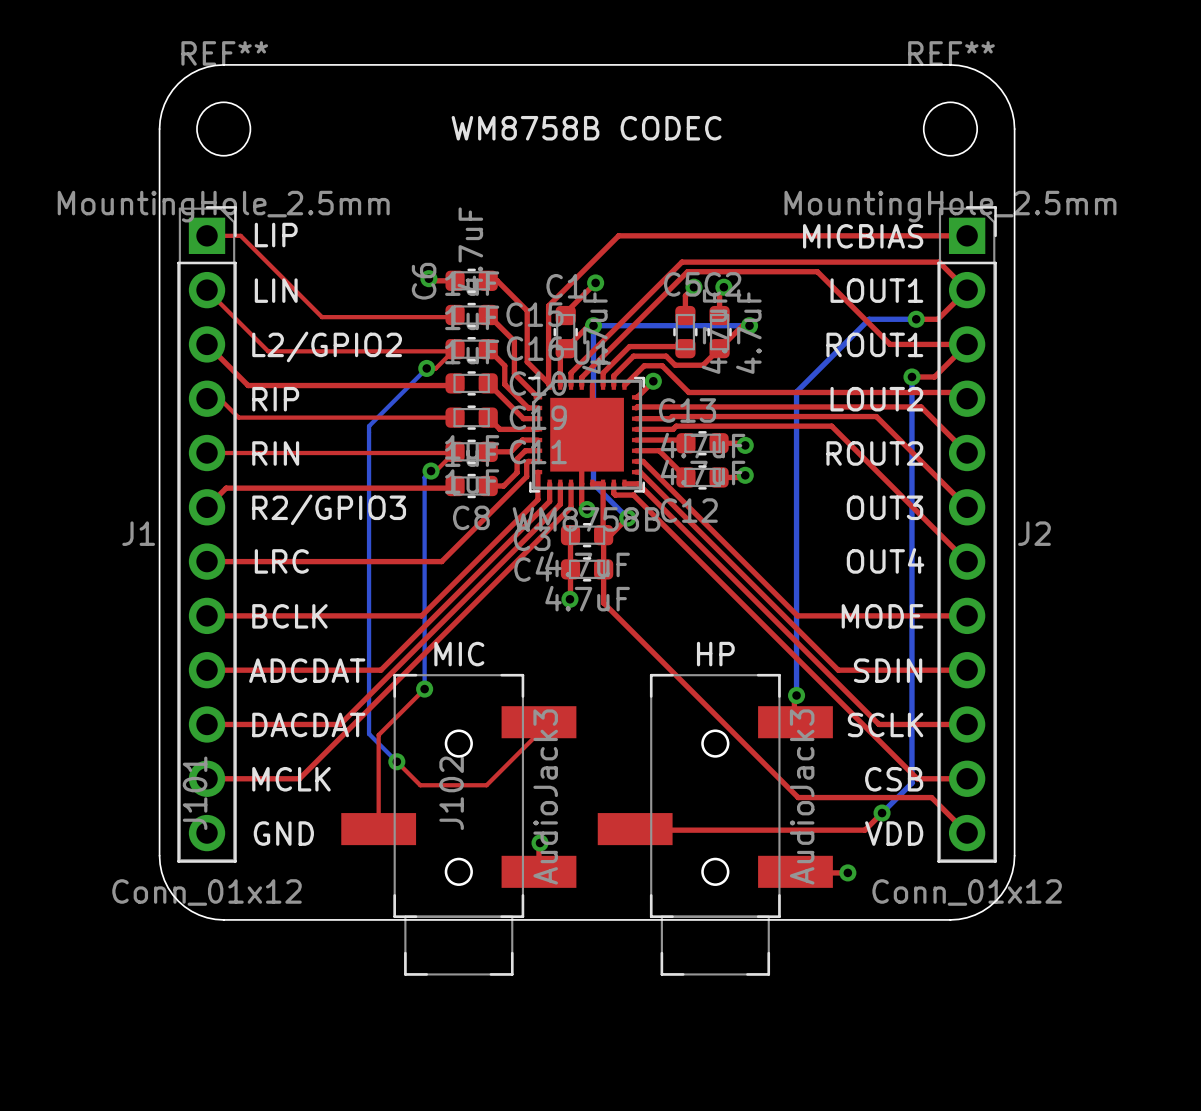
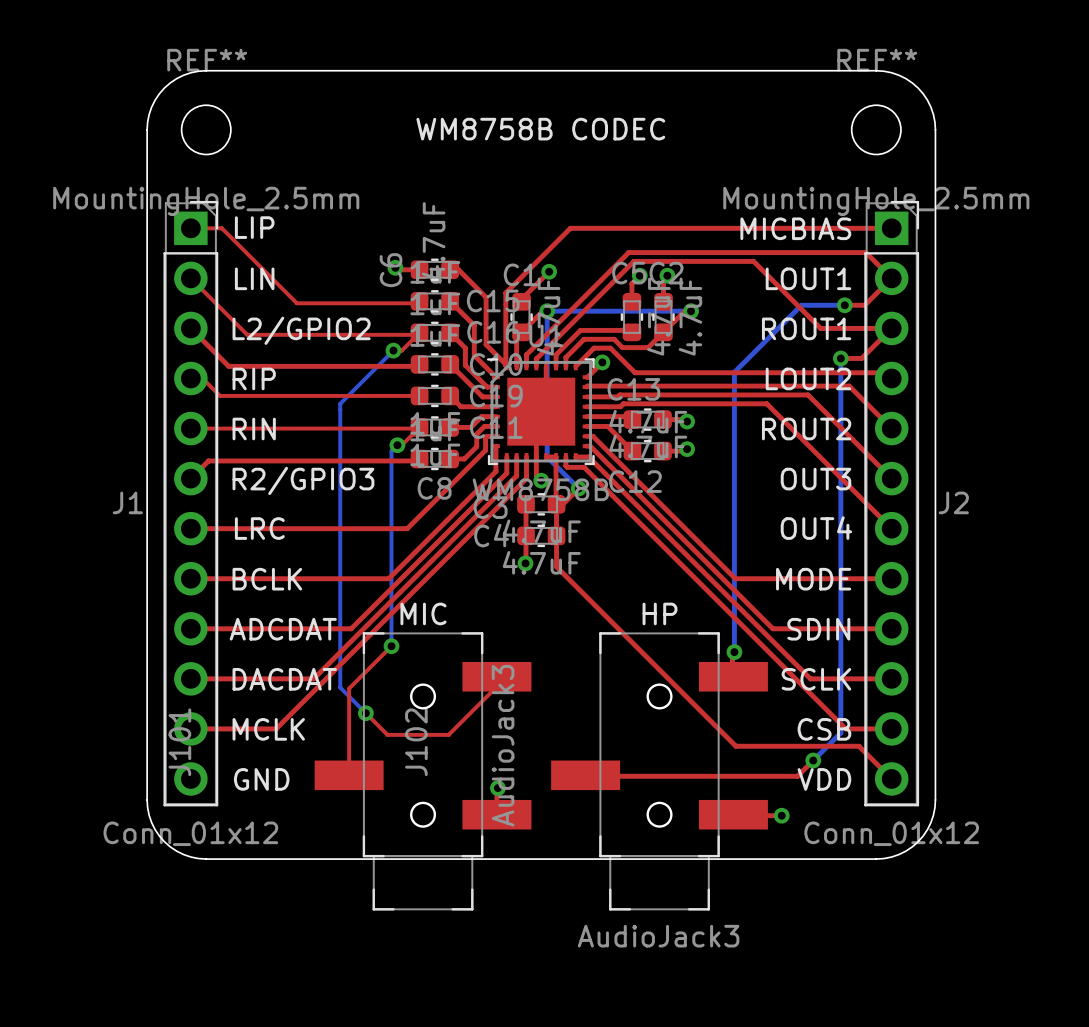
J102 value rotation: 0° (802, 796) -> 90° clockwise (658, 936)
J102 value position: AudioJack3 (802, 796) -> AudioJack3 (658, 936)

